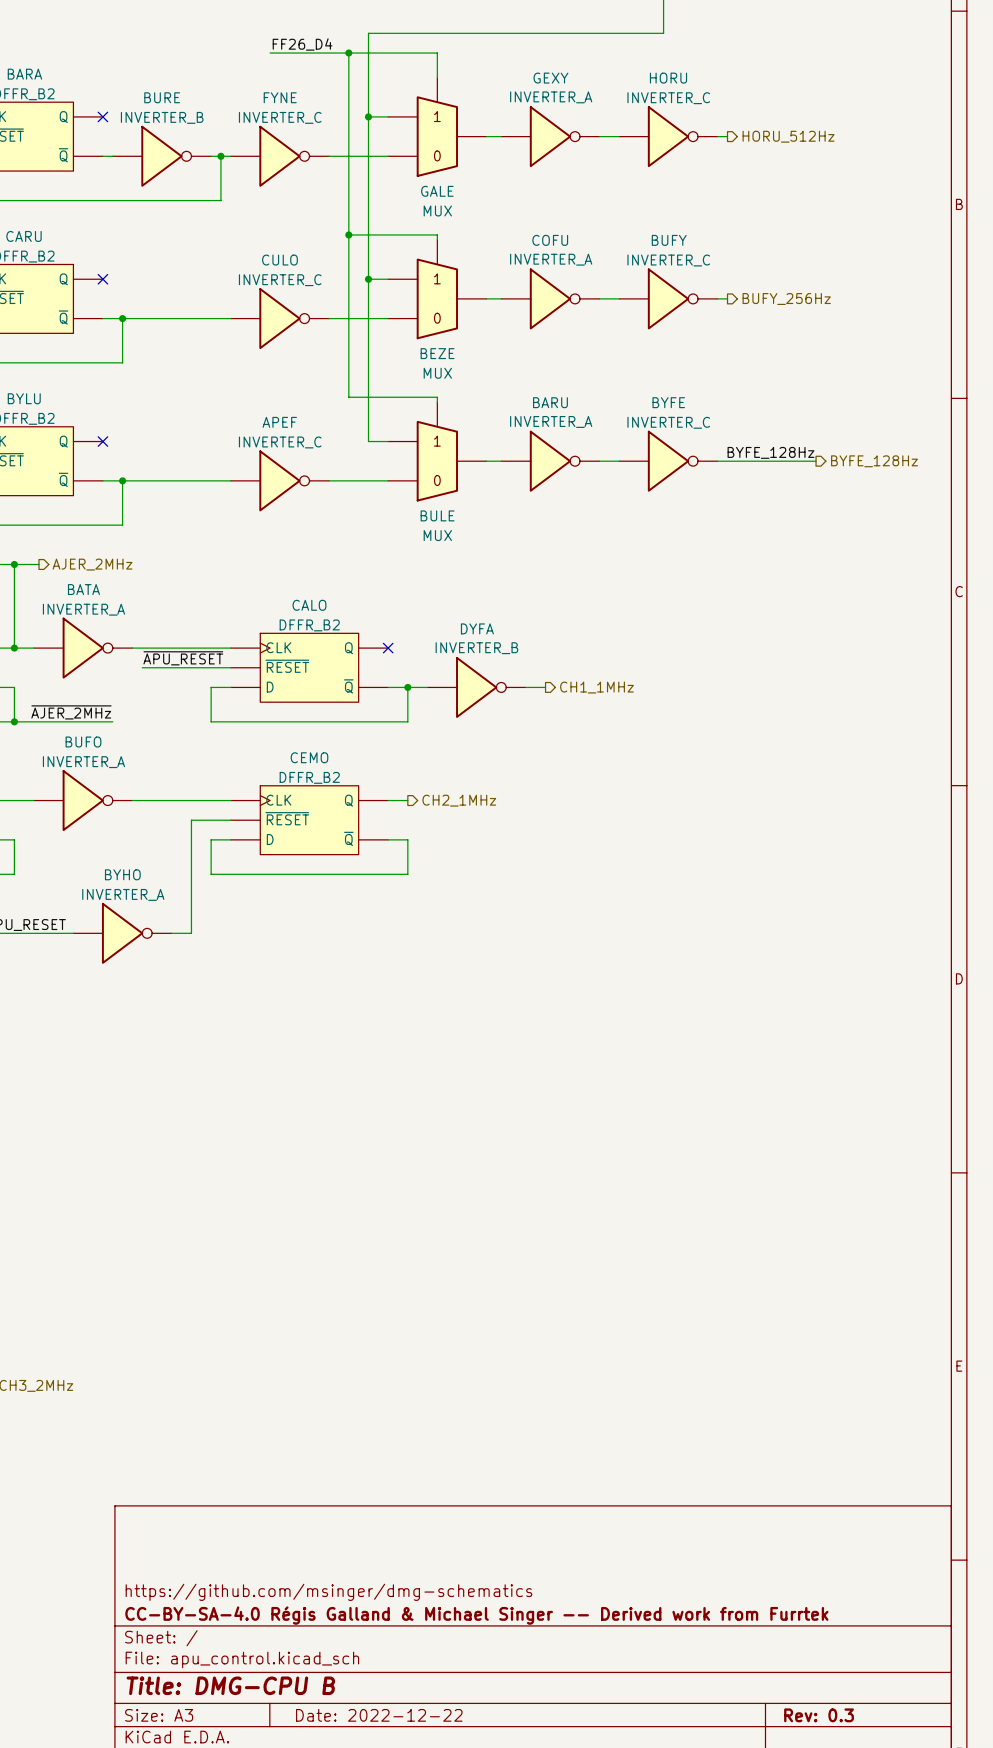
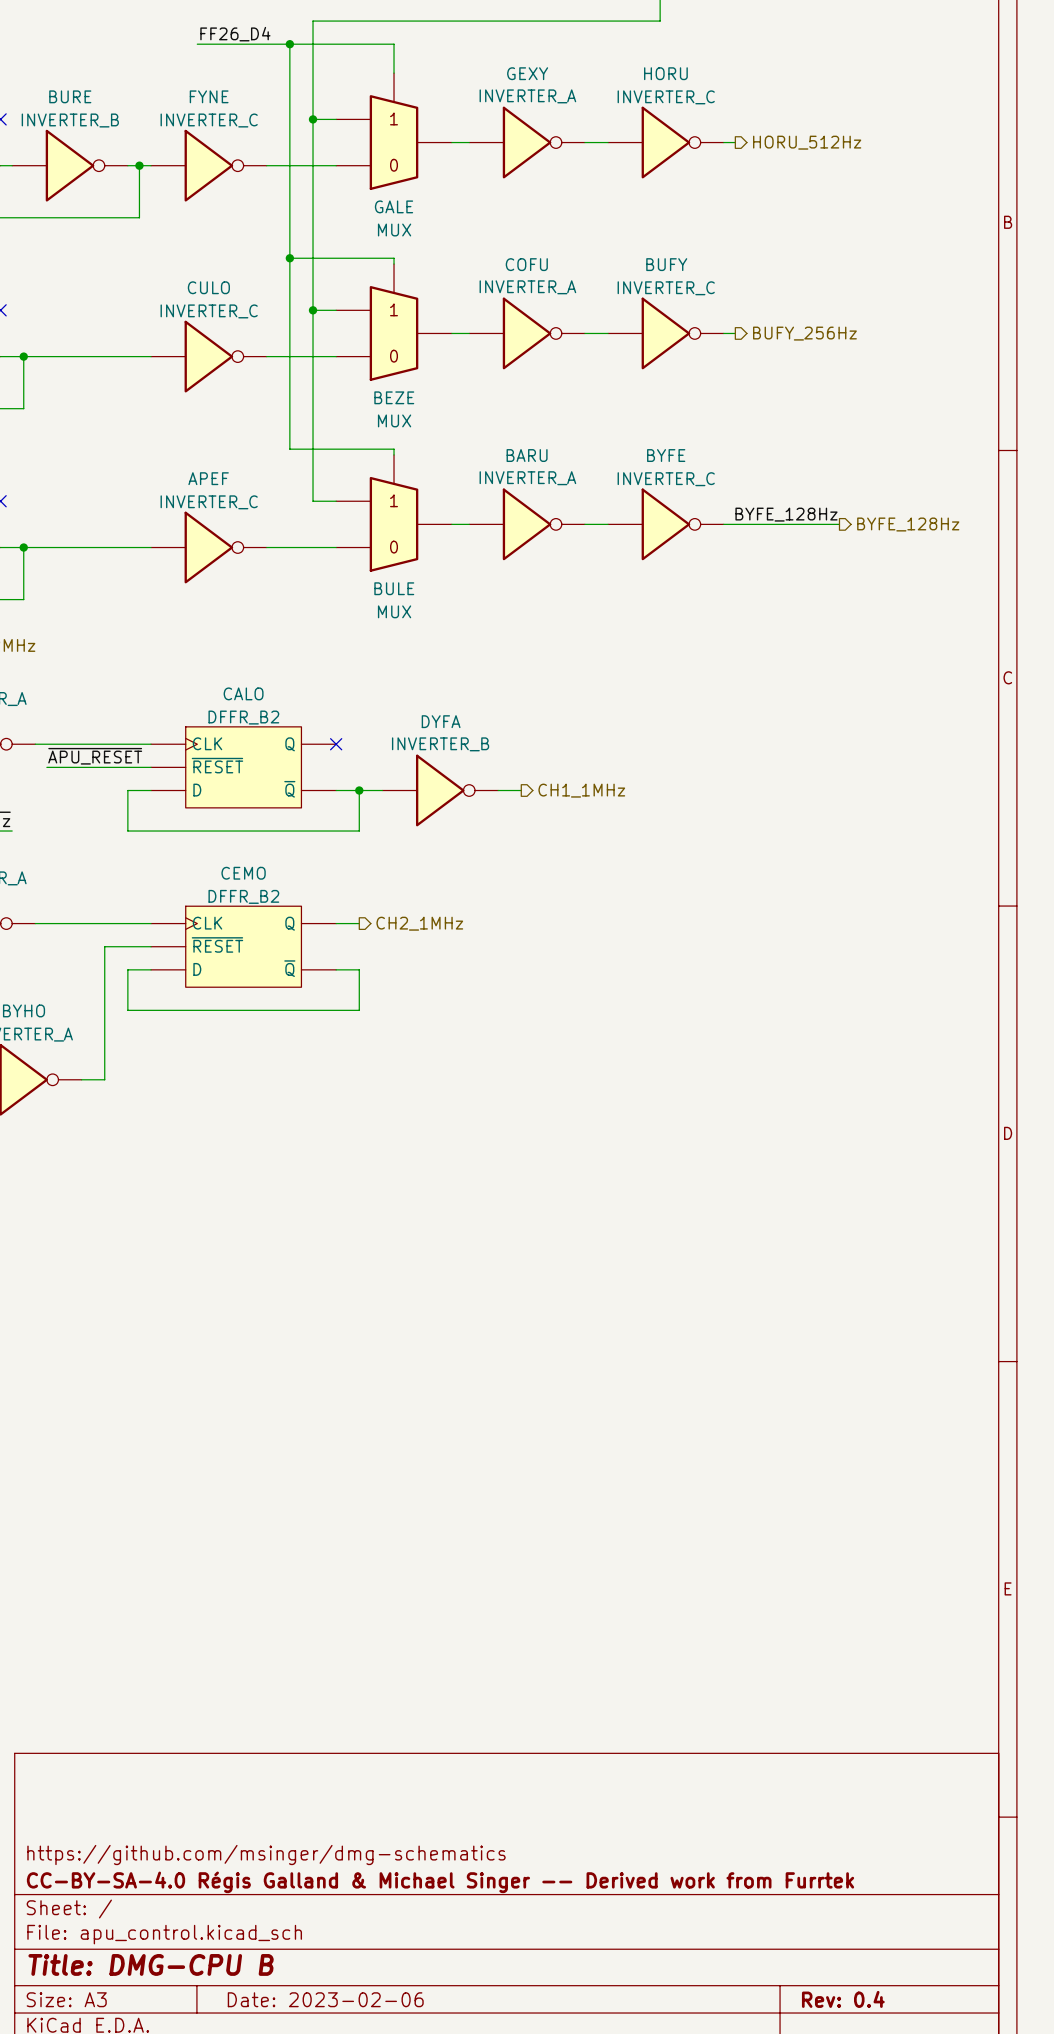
title block: Date: 2022-12-22 (379, 1715) -> Date: 2023-02-06 (325, 1999)
title block: Rev: 0.3 (819, 1715) -> Rev: 0.4 (843, 1999)

